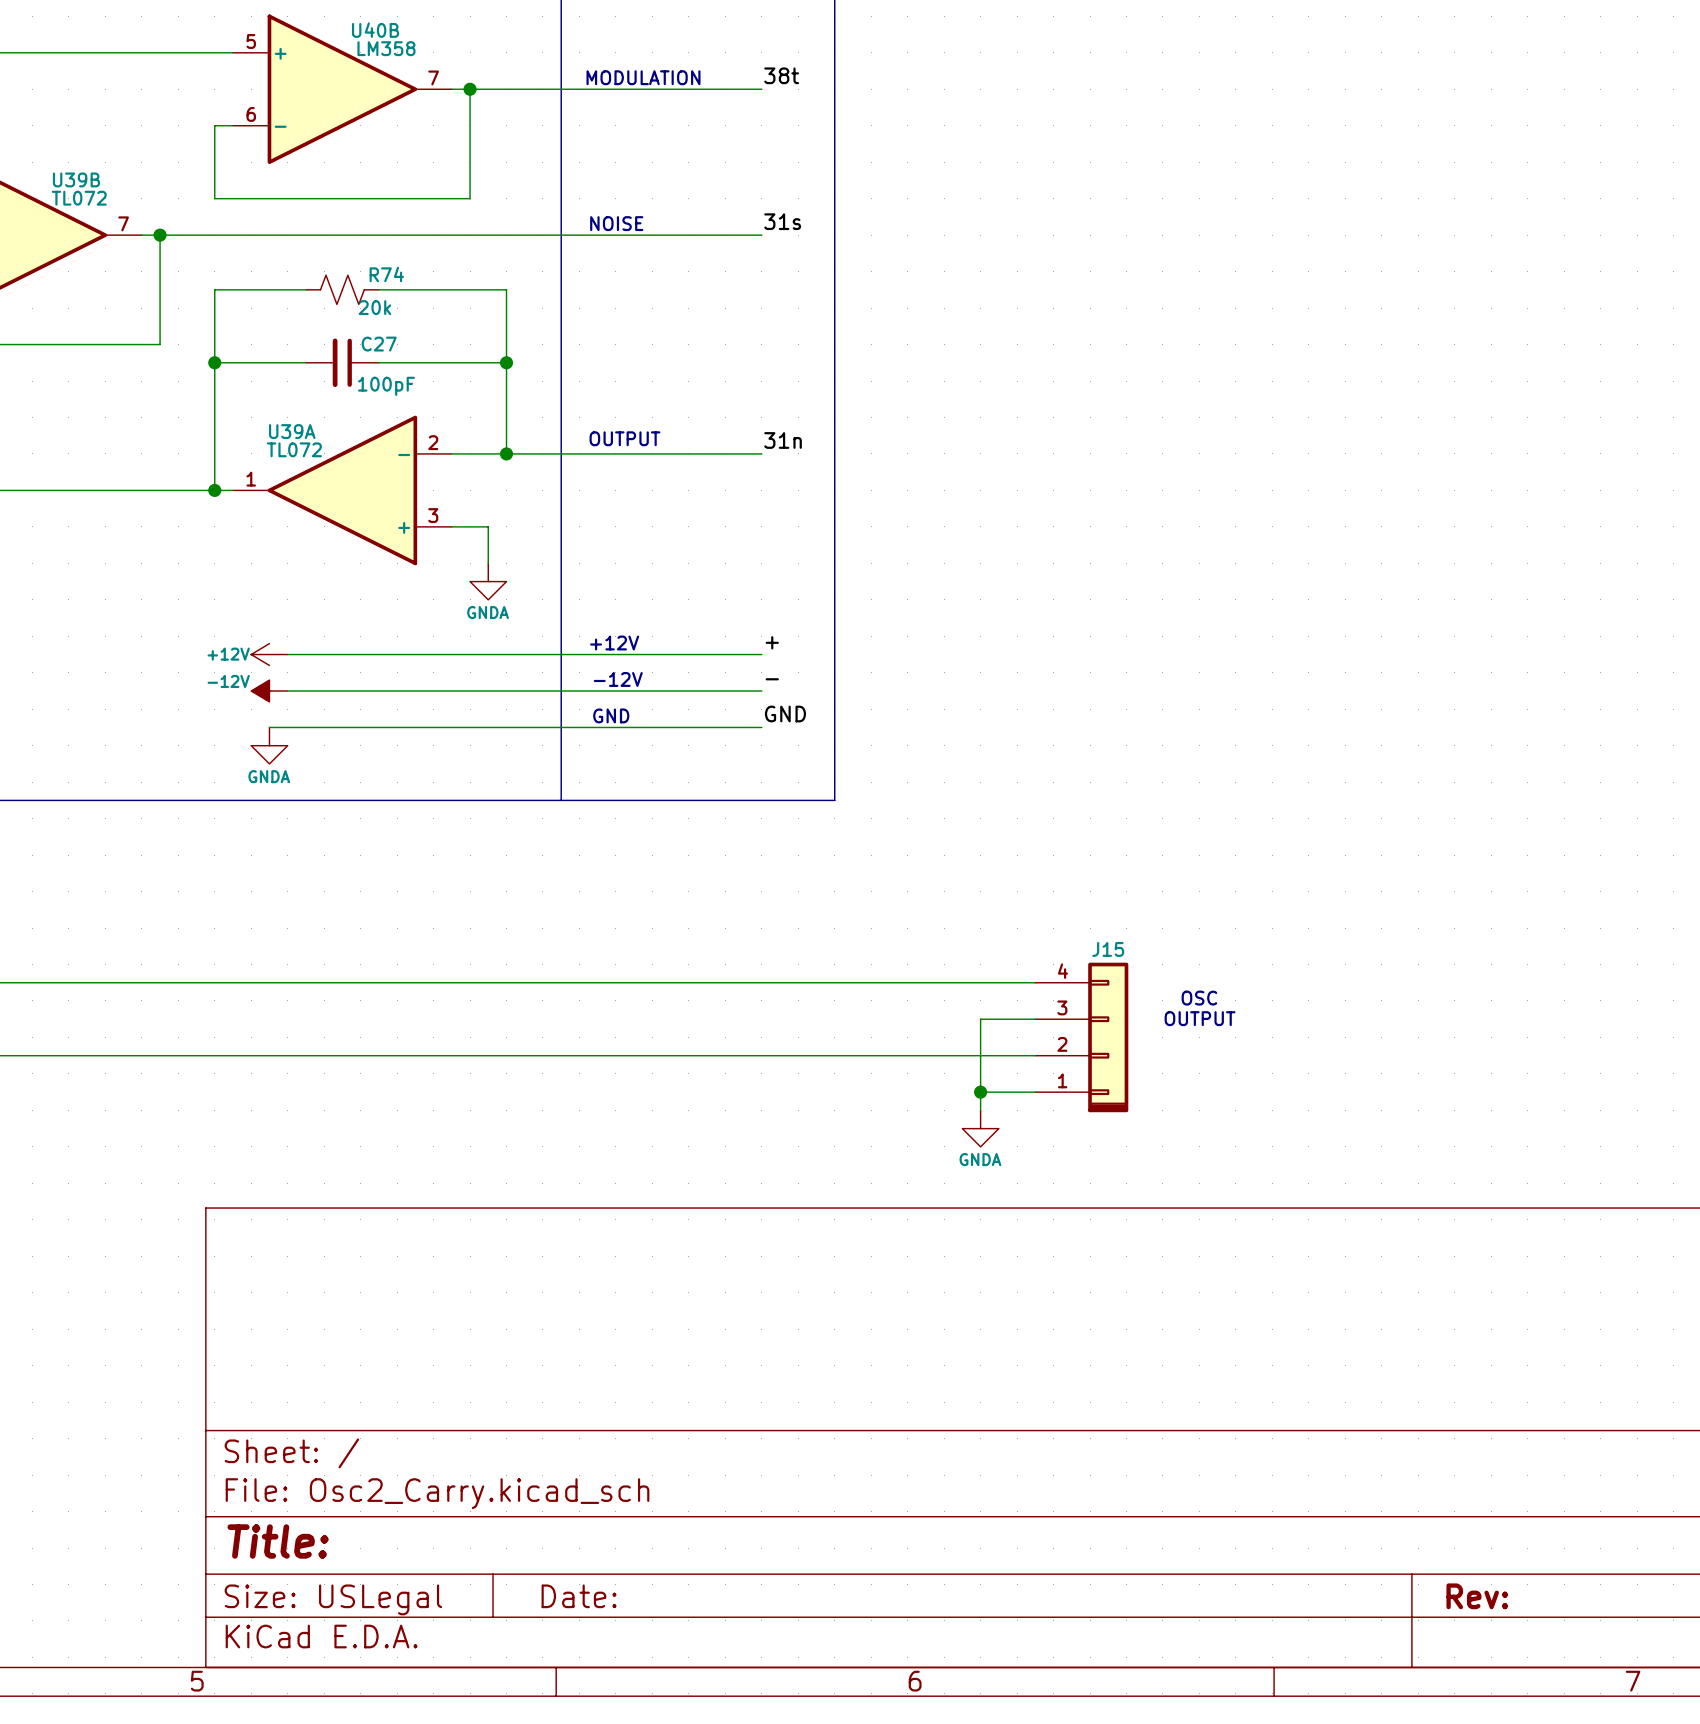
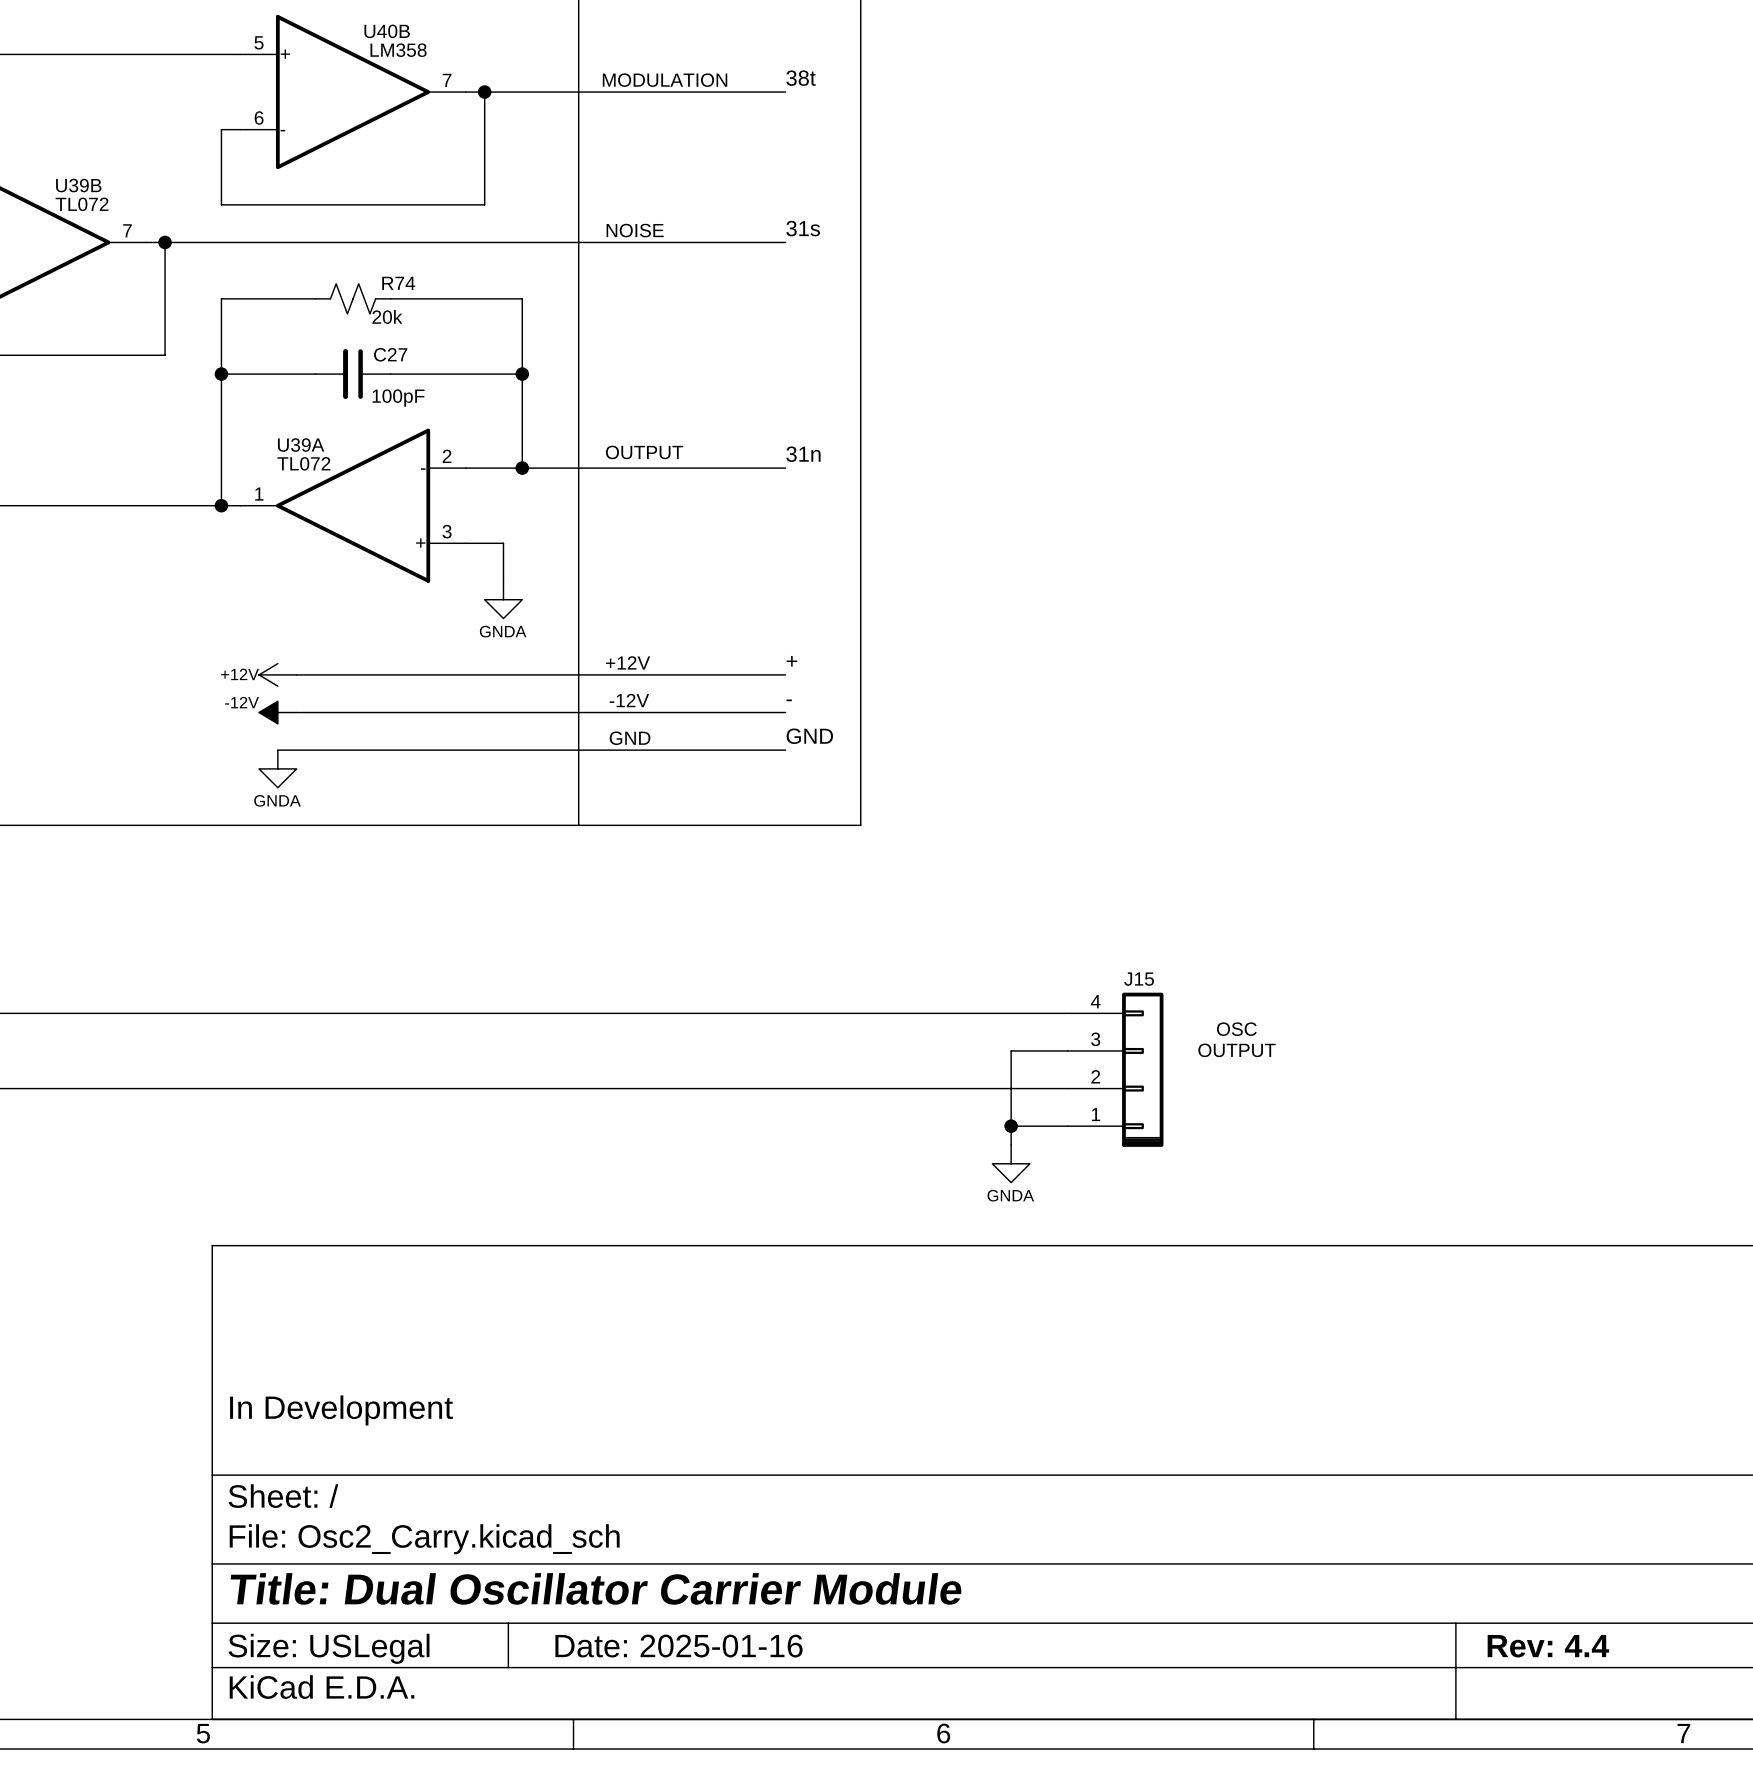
title block: none -> In Development (341, 1410)
title block: Title: (278, 1541) -> Title: Dual Oscillator Carrier Module (596, 1588)
title block: Date: (579, 1596) -> Date: 2025-01-16 (679, 1646)
title block: Rev: (1477, 1596) -> Rev: 4.4 (1548, 1646)

